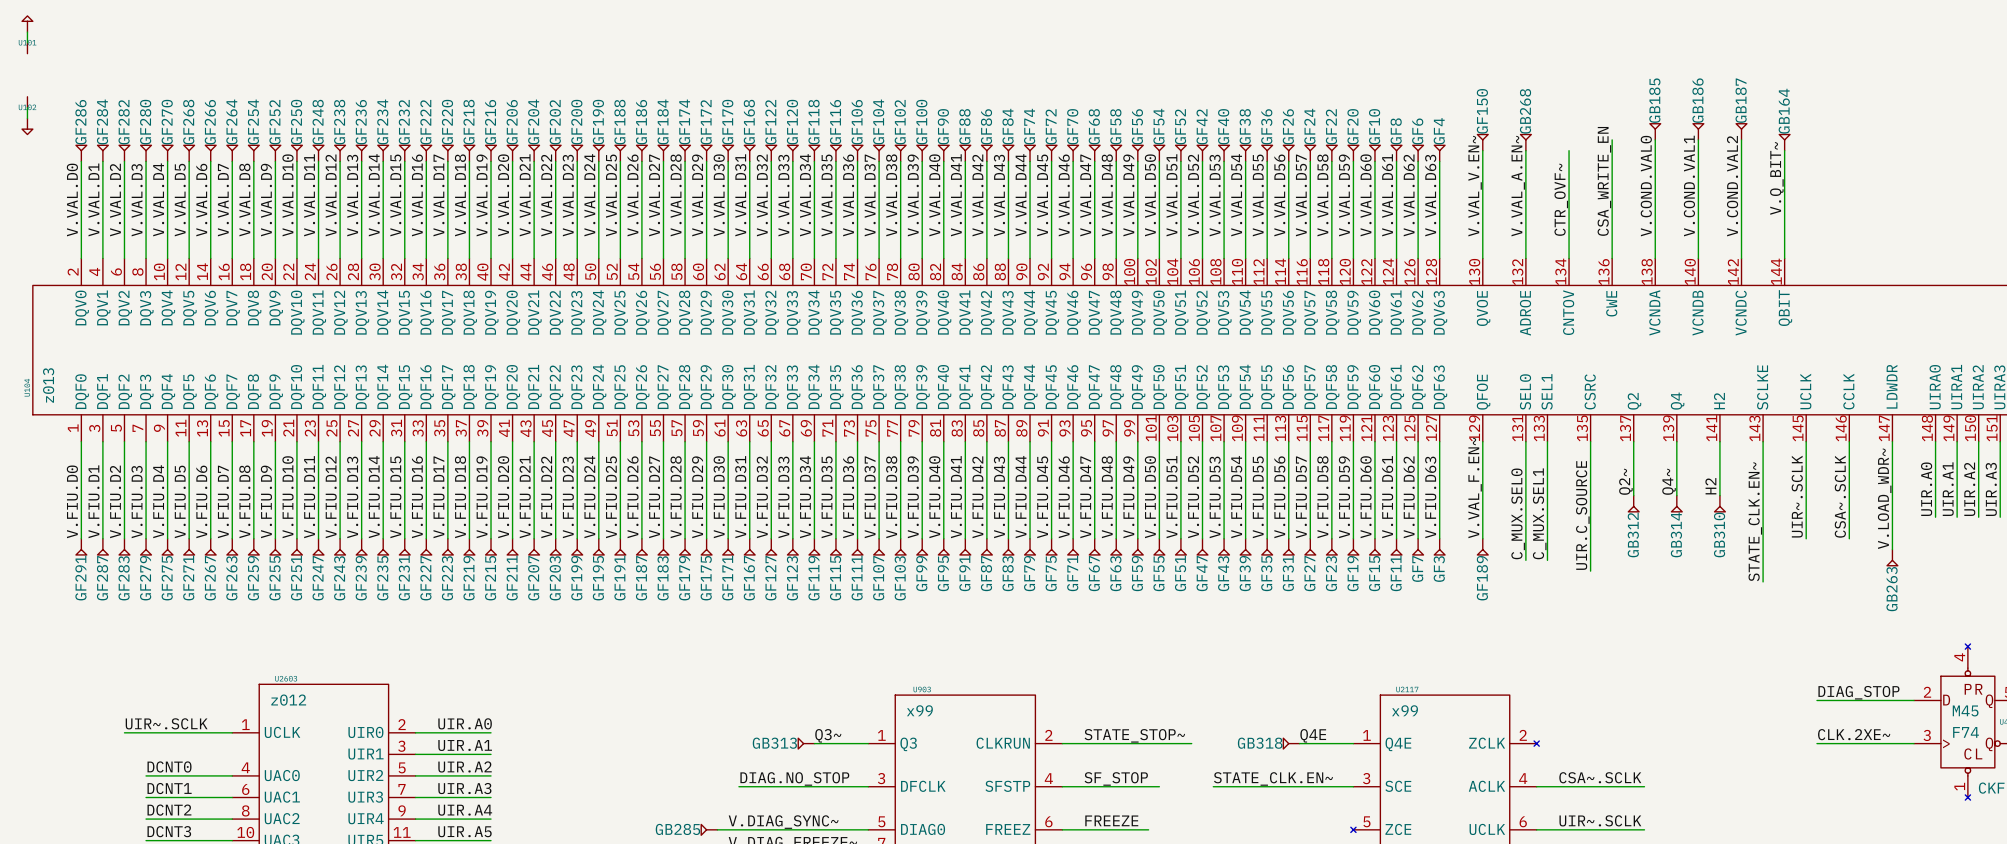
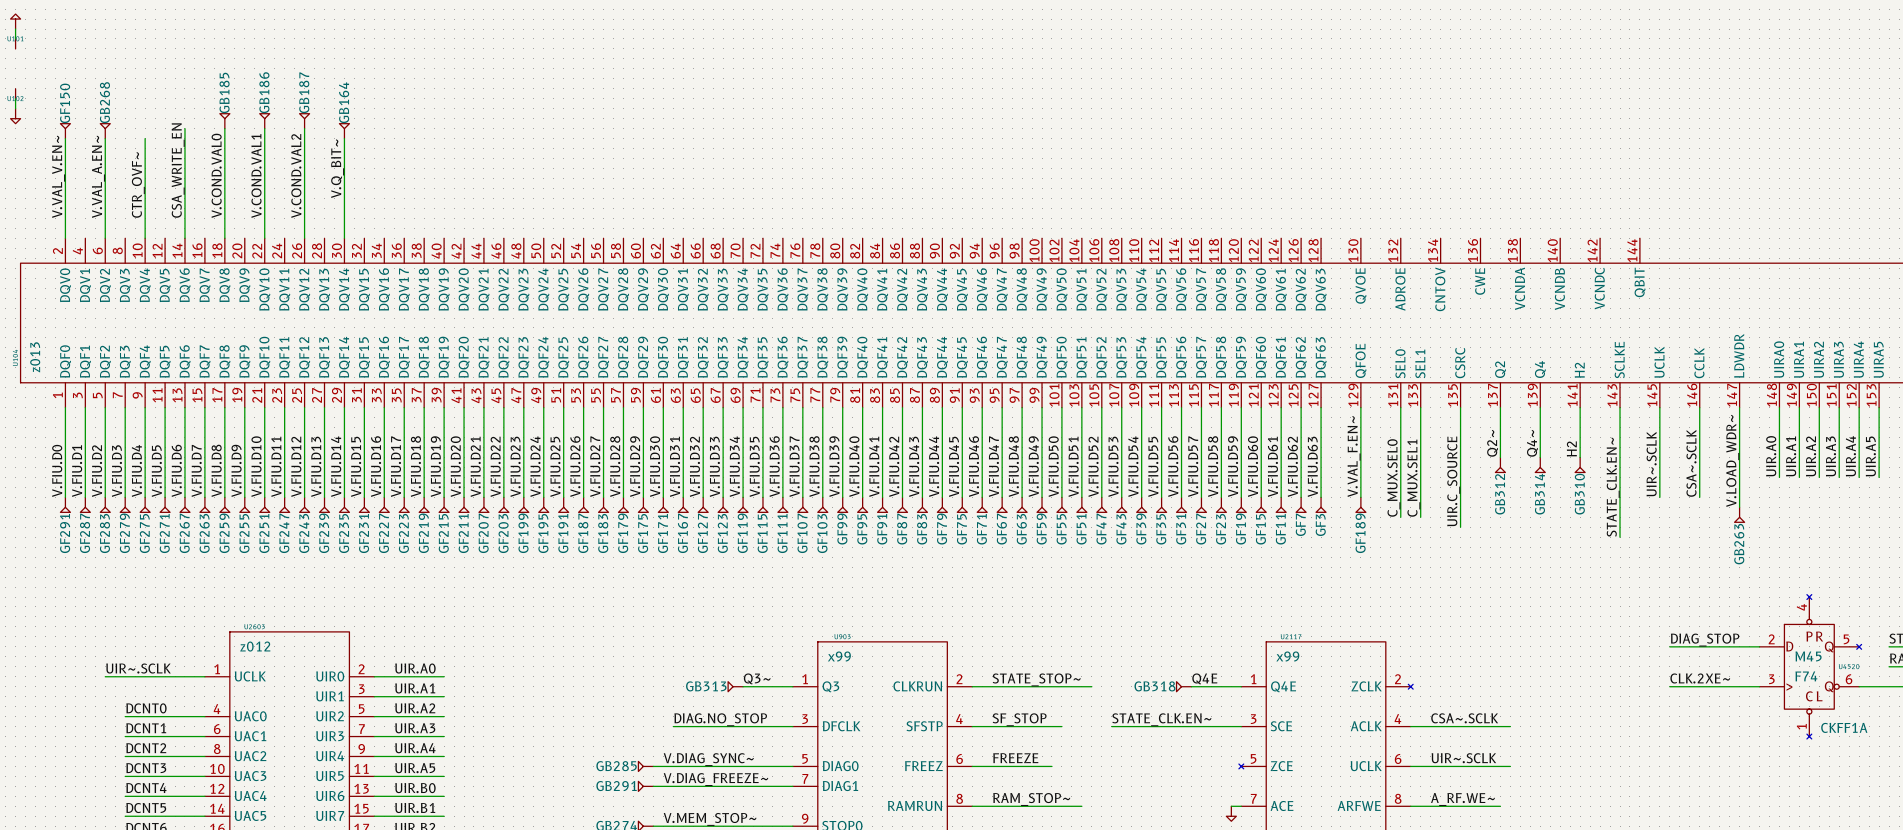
GB185 position: (1655, 131) -> (224, 121)
GB186 position: (1698, 131) -> (264, 121)
GB187 position: (1741, 131) -> (304, 121)
wire: (1612, 139) (1612, 258) -> none
wire: (1655, 139) (1655, 258) -> none
wire: (1698, 139) (1698, 258) -> none
wire: (1741, 139) (1741, 258) -> none
GF150 position: (1482, 142) -> (65, 131)
GB268 position: (1525, 142) -> (105, 131)
GB164 position: (1784, 142) -> (344, 131)
wire: (1482, 150) (1482, 258) -> none
wire: (1525, 150) (1525, 258) -> none
wire: (1569, 150) (1569, 258) -> none
wire: (1784, 150) (1784, 258) -> none
GF286: (81, 153) -> none
GF284: (102, 153) -> none
GF282: (124, 153) -> none
GF280: (146, 153) -> none
GF270: (167, 153) -> none
GF268: (189, 153) -> none
GF266: (210, 153) -> none
GF264: (232, 153) -> none
GF254: (253, 153) -> none
GF252: (275, 153) -> none
GF250: (296, 153) -> none
GF248: (318, 153) -> none
GF238: (340, 153) -> none
GF236: (361, 153) -> none
GF234: (383, 153) -> none
GF232: (404, 153) -> none
GF222: (426, 153) -> none
GF220: (447, 153) -> none
GF218: (469, 153) -> none
GF216: (491, 153) -> none
GF206: (512, 153) -> none
GF204: (534, 153) -> none
GF202: (555, 153) -> none
GF200: (577, 153) -> none
GF190: (598, 153) -> none
GF188: (620, 153) -> none
GF186: (641, 153) -> none
GF184: (663, 153) -> none
GF174: (685, 153) -> none
GF172: (706, 153) -> none
GF170: (728, 153) -> none
GF168: (749, 153) -> none
GF122: (771, 153) -> none
GF120: (792, 153) -> none
GF118: (814, 153) -> none
GF116: (835, 153) -> none
GF106: (857, 153) -> none
GF104: (879, 153) -> none
GF102: (900, 153) -> none
GF100: (922, 153) -> none
GF90: (943, 153) -> none
GF88: (965, 153) -> none
GF86: (986, 153) -> none
GF84: (1008, 153) -> none
GF74: (1030, 153) -> none
GF72: (1051, 153) -> none
GF70: (1073, 153) -> none
GF68: (1094, 153) -> none
GF58: (1116, 153) -> none
GF56: (1137, 153) -> none
GF54: (1159, 153) -> none
GF52: (1180, 153) -> none
GF42: (1202, 153) -> none
GF40: (1224, 153) -> none
GF38: (1245, 153) -> none
GF36: (1267, 153) -> none
GF26: (1288, 153) -> none
GF24: (1310, 153) -> none
GF22: (1331, 153) -> none
GF20: (1353, 153) -> none
GF10: (1374, 153) -> none
GF8: (1396, 153) -> none
GF6: (1418, 153) -> none
GF4: (1439, 153) -> none
wire: (102, 161) (102, 258) -> none
wire: (146, 161) (146, 258) -> none
wire: (189, 161) (189, 258) -> none
wire: (232, 161) (232, 258) -> none
wire: (275, 161) (275, 258) -> none
wire: (318, 161) (318, 258) -> none
wire: (361, 161) (361, 258) -> none
wire: (404, 161) (404, 258) -> none
wire: (426, 161) (426, 258) -> none
wire: (447, 161) (447, 258) -> none
wire: (469, 161) (469, 258) -> none
wire: (491, 161) (491, 258) -> none
wire: (512, 161) (512, 258) -> none
wire: (534, 161) (534, 258) -> none
wire: (555, 161) (555, 258) -> none
wire: (577, 161) (577, 258) -> none
wire: (598, 161) (598, 258) -> none
wire: (620, 161) (620, 258) -> none
wire: (641, 161) (641, 258) -> none
wire: (663, 161) (663, 258) -> none
wire: (685, 161) (685, 258) -> none
wire: (706, 161) (706, 258) -> none
wire: (728, 161) (728, 258) -> none
wire: (749, 161) (749, 258) -> none
wire: (771, 161) (771, 258) -> none
wire: (792, 161) (792, 258) -> none
wire: (814, 161) (814, 258) -> none
wire: (835, 161) (835, 258) -> none
wire: (857, 161) (857, 258) -> none
wire: (879, 161) (879, 258) -> none
wire: (900, 161) (900, 258) -> none
wire: (922, 161) (922, 258) -> none
wire: (943, 161) (943, 258) -> none
wire: (965, 161) (965, 258) -> none
wire: (986, 161) (986, 258) -> none
wire: (1008, 161) (1008, 258) -> none
wire: (1030, 161) (1030, 258) -> none
wire: (1051, 161) (1051, 258) -> none
wire: (1073, 161) (1073, 258) -> none
wire: (1094, 161) (1094, 258) -> none
wire: (1116, 161) (1116, 258) -> none
wire: (1137, 161) (1137, 258) -> none
wire: (1159, 161) (1159, 258) -> none
wire: (1180, 161) (1180, 258) -> none
wire: (1202, 161) (1202, 258) -> none
wire: (1224, 161) (1224, 258) -> none
wire: (1245, 161) (1245, 258) -> none
wire: (1267, 161) (1267, 258) -> none
wire: (1288, 161) (1288, 258) -> none
wire: (1310, 161) (1310, 258) -> none
wire: (1331, 161) (1331, 258) -> none
wire: (1353, 161) (1353, 258) -> none
wire: (1374, 161) (1374, 258) -> none
wire: (1396, 161) (1396, 258) -> none
wire: (1418, 161) (1418, 258) -> none
wire: (1439, 161) (1439, 258) -> none
label: none -> V.Q_BIT~ (337, 168)
label: V.Q_BIT~ (1776, 178) -> none
label: CSA_WRITE_EN (1604, 181) -> none
label: V.VAL_V.EN~ (1475, 186) -> none
label: V.VAL_A.EN~ (1518, 186) -> none
label: V.COND.VAL0 (1646, 186) -> none
label: V.COND.VAL1 (1689, 186) -> none
label: V.COND.VAL2 (1732, 186) -> none
label: V.VAL.D10 (287, 195) -> V.COND.VAL1 (256, 176)
label: V.VAL.D11 (309, 195) -> none
label: V.VAL.D12 (331, 195) -> V.COND.VAL2 (296, 175)
label: V.VAL.D13 (352, 195) -> none
label: V.VAL.D14 (374, 195) -> none
label: V.VAL.D15 (395, 195) -> none
label: V.VAL.D16 (417, 195) -> none
label: V.VAL.D17 (438, 195) -> none
label: V.VAL.D18 (460, 195) -> none
label: V.VAL.D19 (482, 195) -> none
label: V.VAL.D20 (503, 195) -> none
label: V.VAL.D21 (525, 195) -> none
label: V.VAL.D22 (546, 195) -> none
label: V.VAL.D23 (568, 195) -> none
label: V.VAL.D24 (589, 195) -> none
label: V.VAL.D25 (611, 195) -> none
label: V.VAL.D26 (632, 195) -> none
label: V.VAL.D27 (654, 195) -> none
label: V.VAL.D28 (676, 195) -> none
label: V.VAL.D29 (697, 195) -> none
label: V.VAL.D30 (719, 195) -> none
label: V.VAL.D31 (740, 195) -> none
label: V.VAL.D32 (762, 195) -> none
label: V.VAL.D33 (783, 195) -> none
label: V.VAL.D34 (805, 195) -> none
label: V.VAL.D35 (827, 195) -> none
label: V.VAL.D36 (848, 195) -> none
label: V.VAL.D37 (870, 195) -> none
label: V.VAL.D38 (891, 195) -> none
label: V.VAL.D39 (913, 195) -> none
label: V.VAL.D40 (934, 195) -> none
label: V.VAL.D41 (956, 195) -> none
label: V.VAL.D42 (977, 195) -> none
label: V.VAL.D43 (999, 195) -> none
label: V.VAL.D44 (1021, 195) -> none
label: V.VAL.D45 (1042, 195) -> none
label: V.VAL.D46 (1064, 195) -> none
label: V.VAL.D47 (1085, 195) -> none
label: V.VAL.D48 (1107, 195) -> none
label: V.VAL.D49 (1128, 195) -> none
label: V.VAL.D50 (1150, 195) -> none
label: V.VAL.D51 (1172, 195) -> none
label: V.VAL.D52 (1193, 195) -> none
label: V.VAL.D53 (1215, 195) -> none
label: V.VAL.D54 (1236, 195) -> none
label: V.VAL.D55 (1258, 195) -> none
label: V.VAL.D56 (1279, 195) -> none
label: V.VAL.D57 (1301, 195) -> none
label: V.VAL.D58 (1322, 195) -> none
label: V.VAL.D59 (1344, 195) -> none
label: V.VAL.D60 (1366, 195) -> none
label: V.VAL.D61 (1387, 195) -> none
label: V.VAL.D62 (1409, 195) -> none
label: V.VAL.D63 (1430, 195) -> none
label: V.VAL.D1 (94, 199) -> none
label: V.VAL.D4 (158, 199) -> CTR_OVF~ (138, 184)
label: CTR_OVF~ (1561, 199) -> none
label: V.VAL.D0 (72, 200) -> V.VAL_V.EN~ (58, 176)
label: V.VAL.D2 (115, 200) -> V.VAL_A.EN~ (98, 176)
label: V.VAL.D3 (137, 200) -> none
label: V.VAL.D5 (180, 200) -> none
label: V.VAL.D6 (201, 200) -> CSA_WRITE_EN (178, 170)
label: V.VAL.D7 (223, 200) -> none
label: V.VAL.D8 (244, 200) -> V.COND.VAL0 (216, 175)
label: V.VAL.D9 (266, 200) -> none

